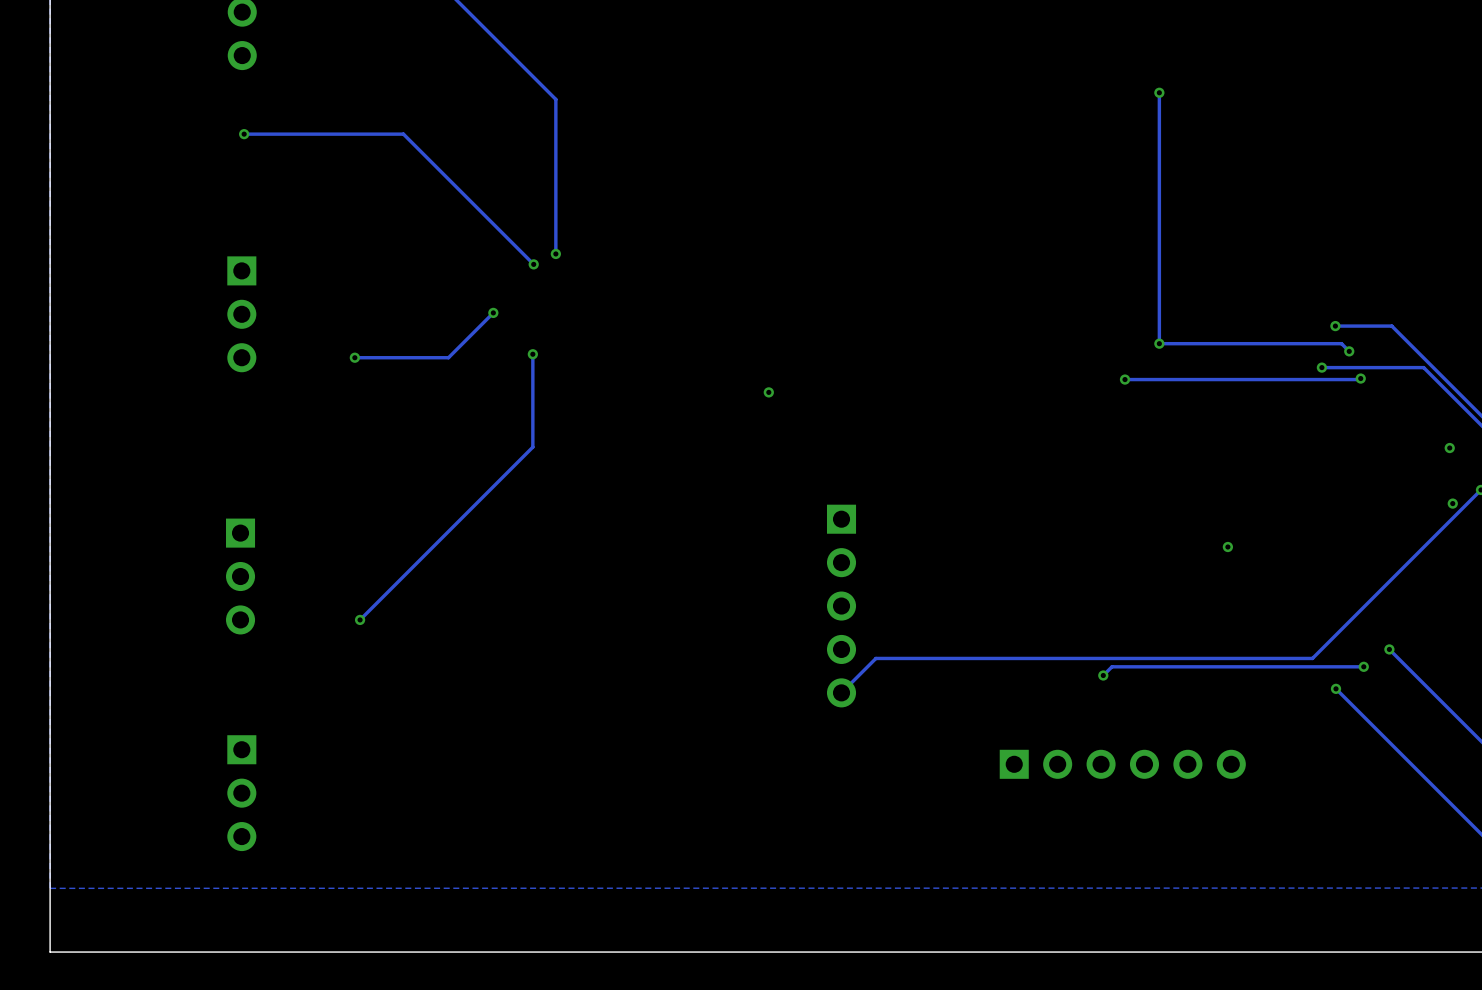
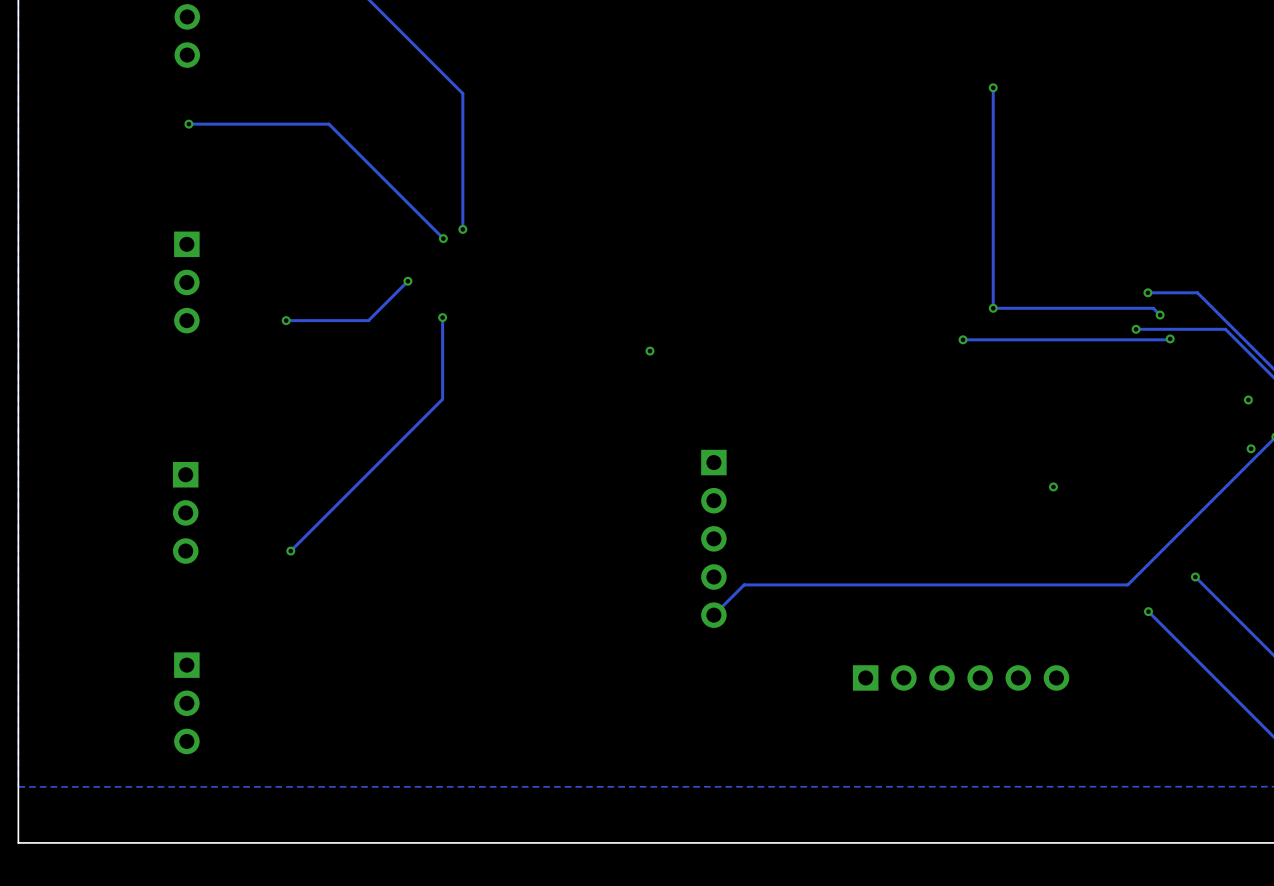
track: (1363, 666) (1111, 666) (1103, 675) -> none
via: (1363, 666) -> none
via: (1103, 675) -> none

